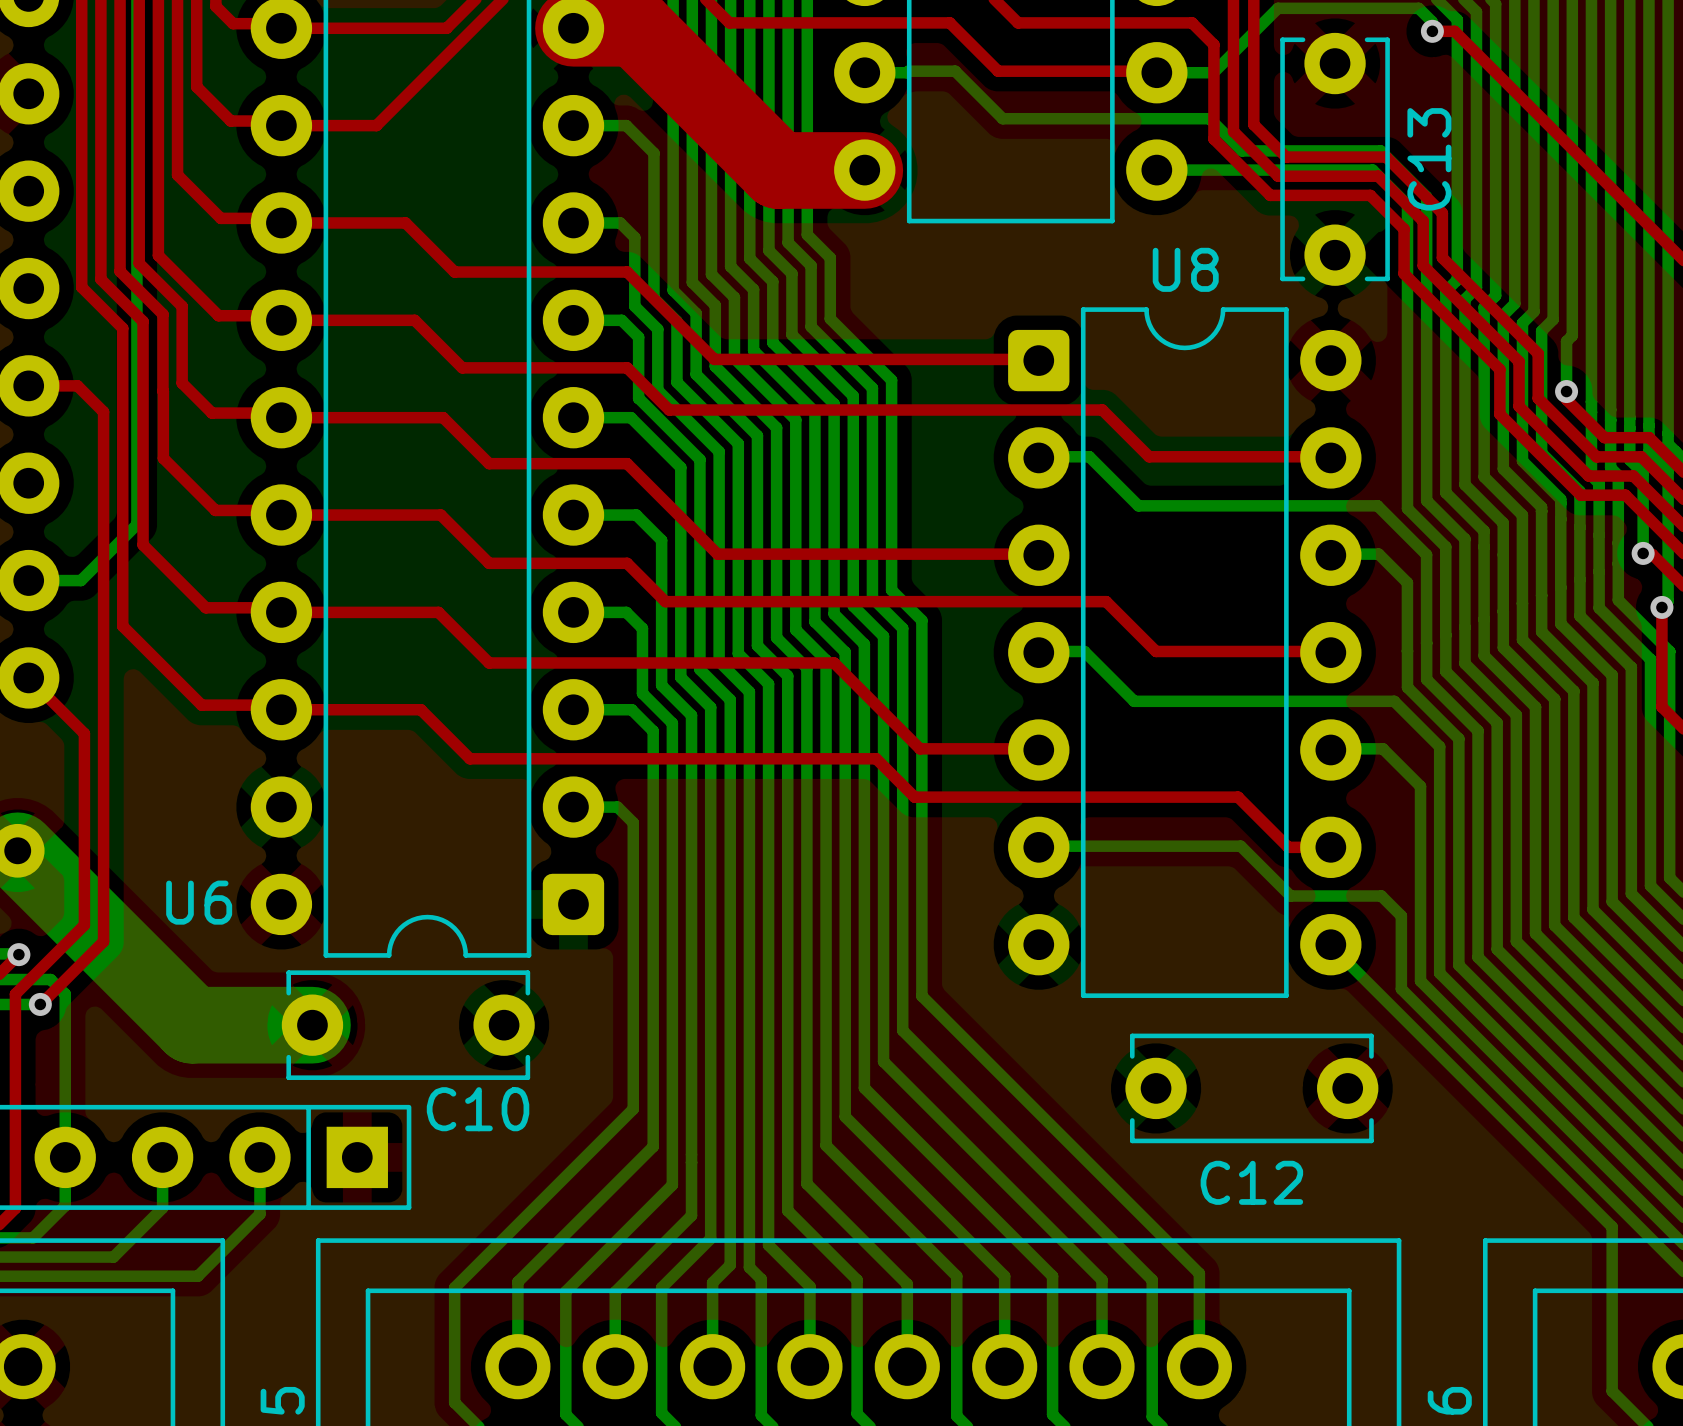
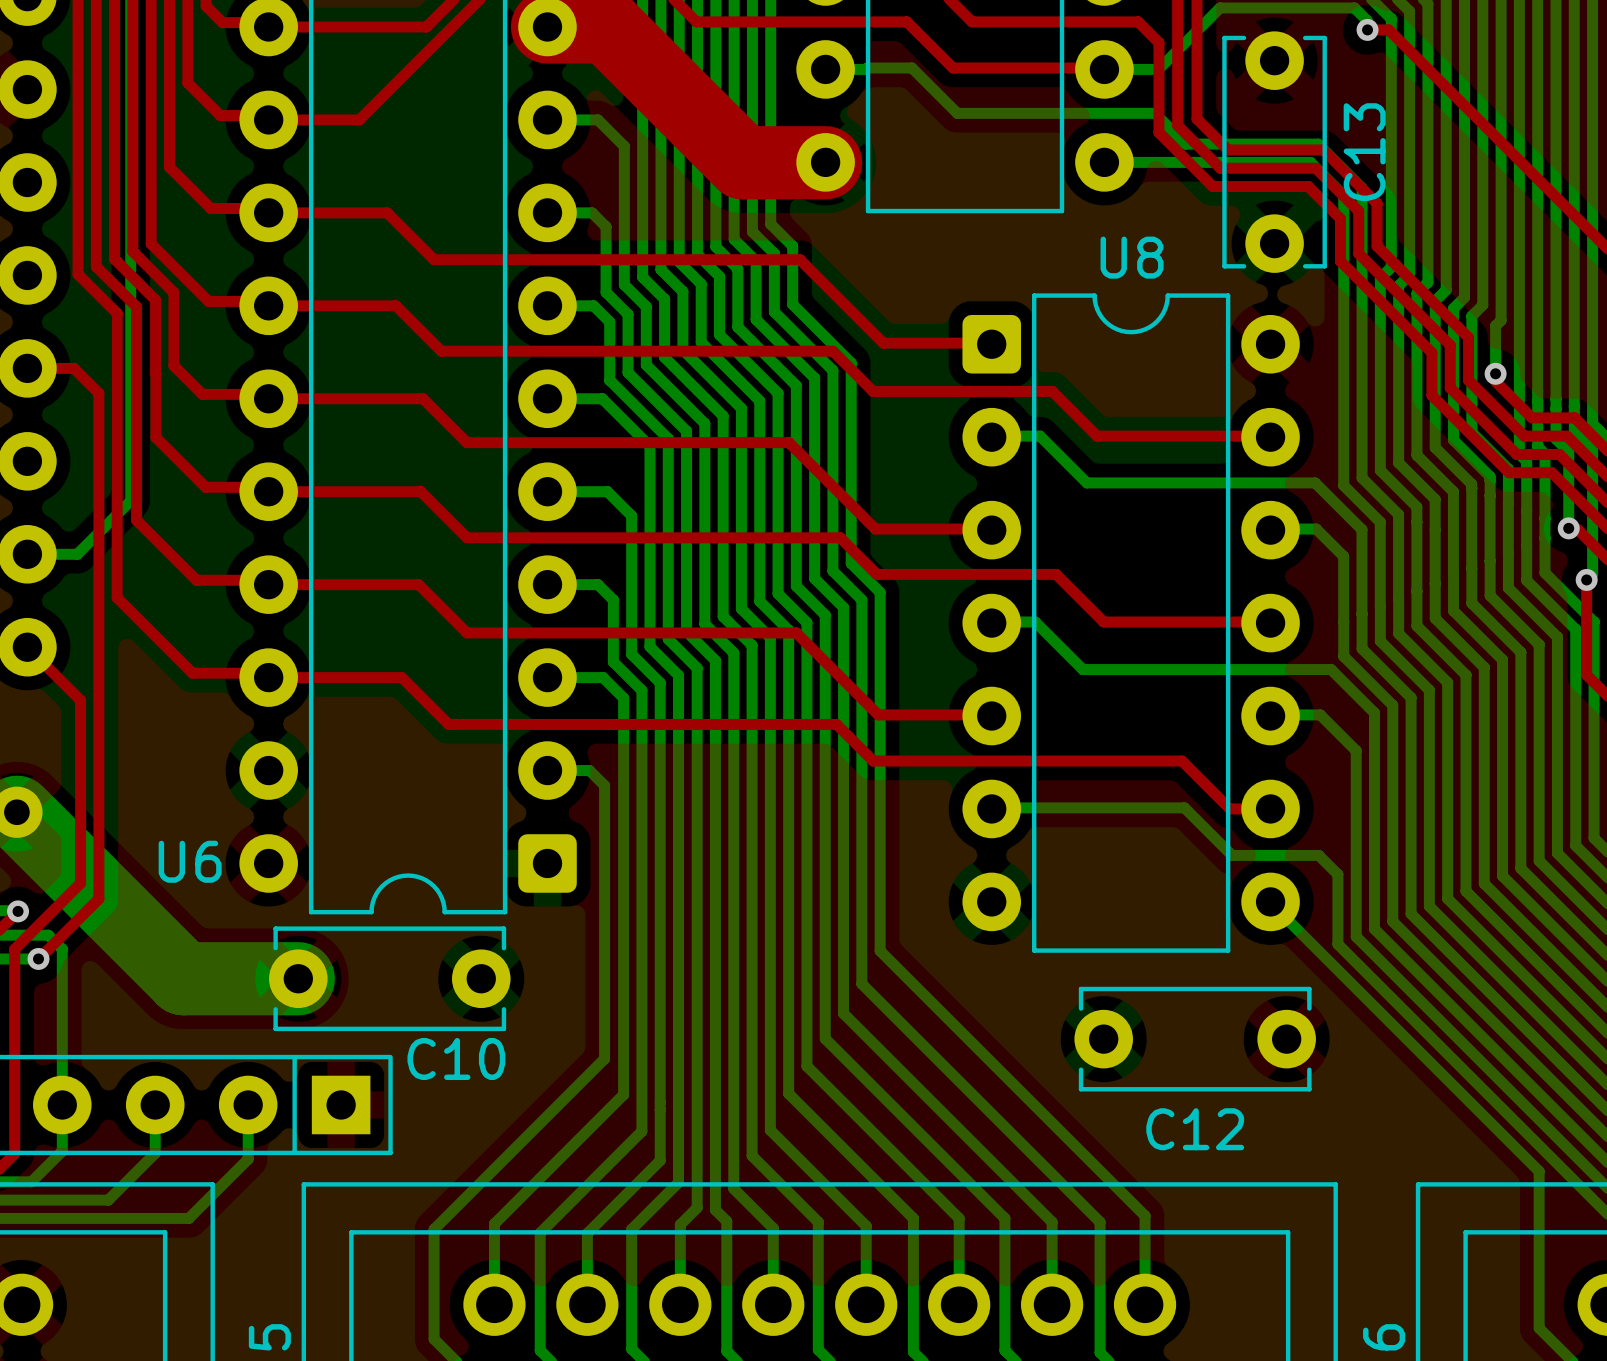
top track: (627, 272) (714, 359) (925, 359) -> (598, 259) (799, 259) (883, 343)
top track: (627, 367) (669, 410) (914, 410) -> (598, 351) (832, 351) (873, 391)
top track: (627, 463) (717, 554) (916, 554) -> (598, 442) (789, 442) (875, 529)
top track: (627, 563) (665, 601) (918, 601) -> (598, 537) (840, 537) (876, 574)

